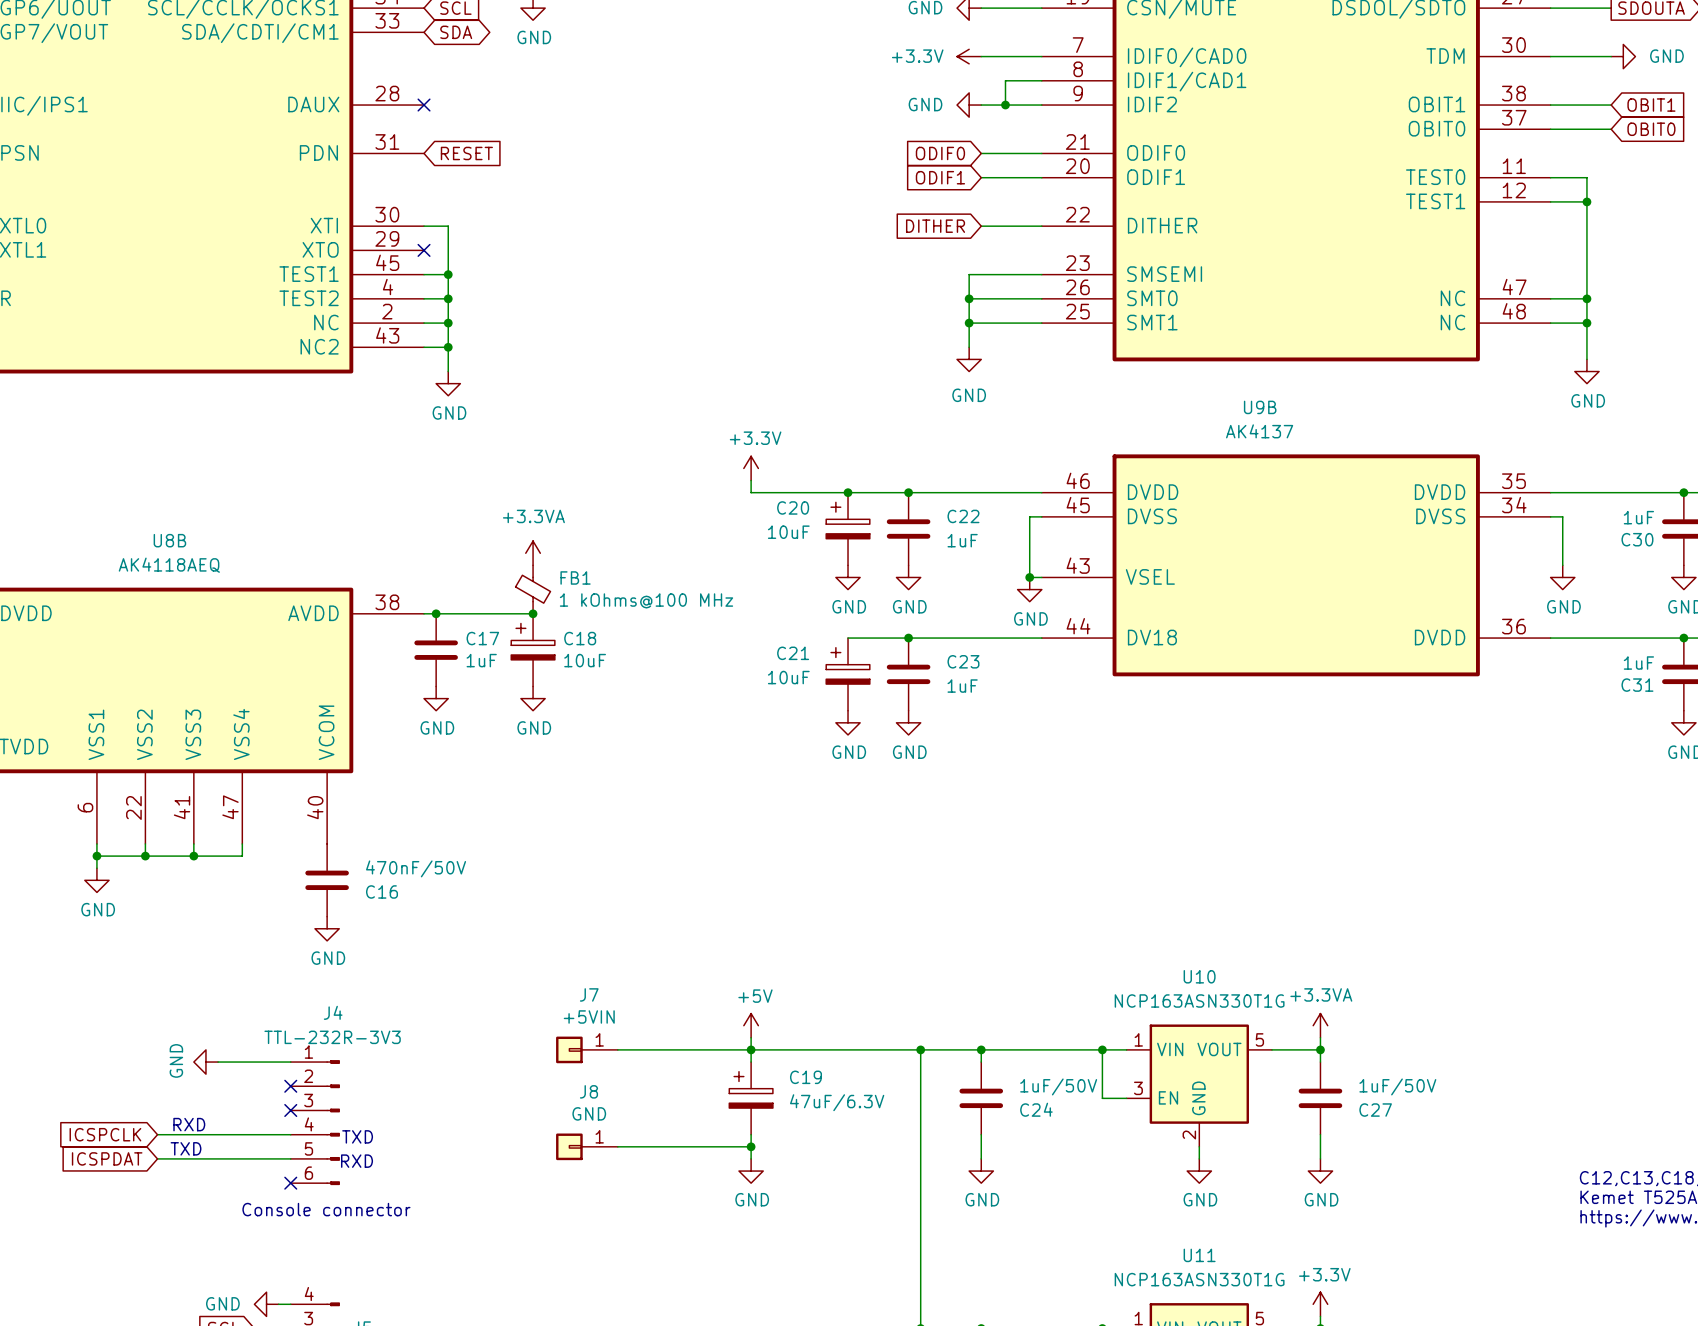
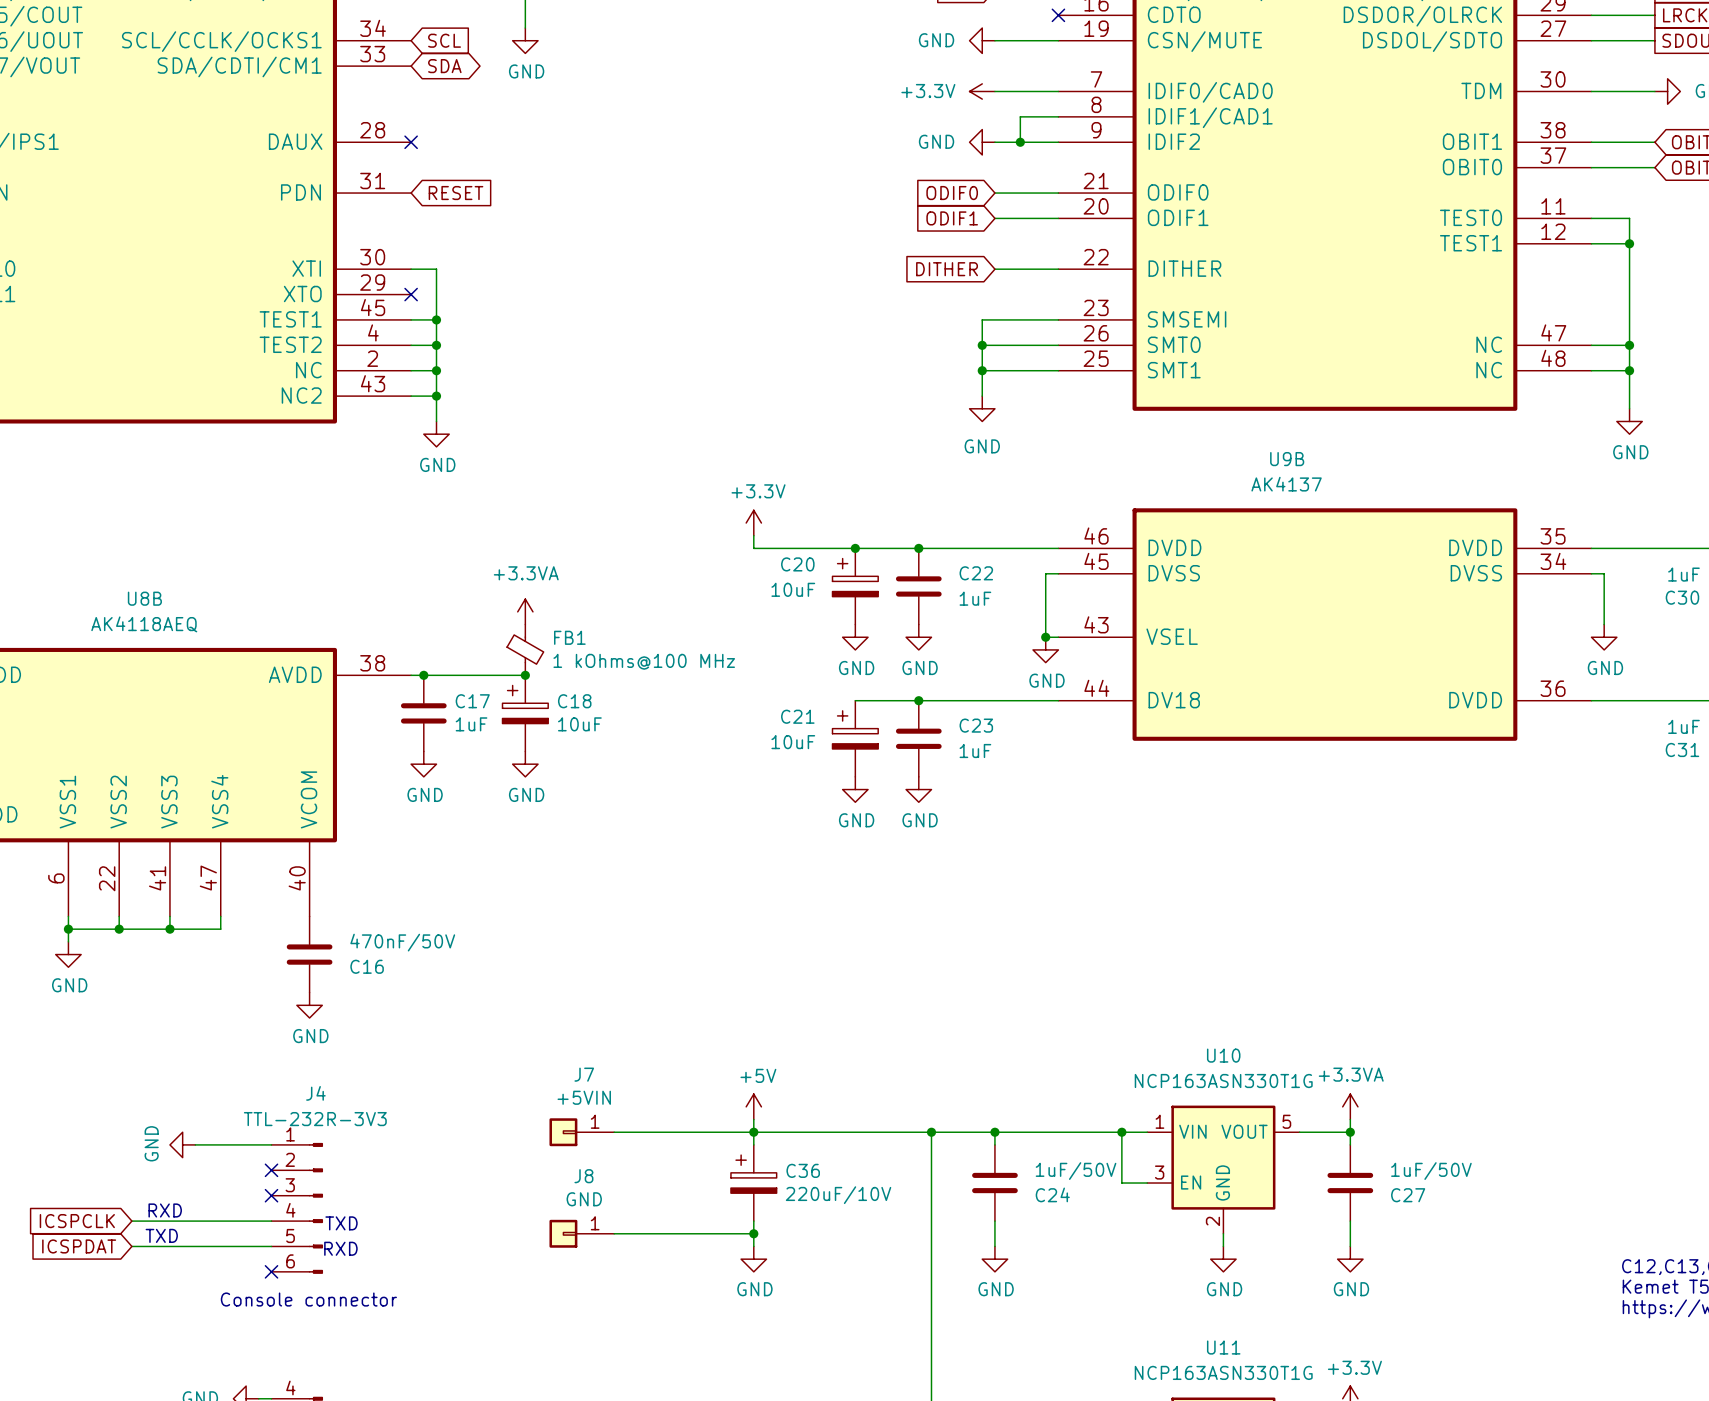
C19 name: C19 (805, 1077) -> C36 (803, 1170)
C19 value: 47uF/6.3V (837, 1102) -> 220uF/10V (838, 1195)

